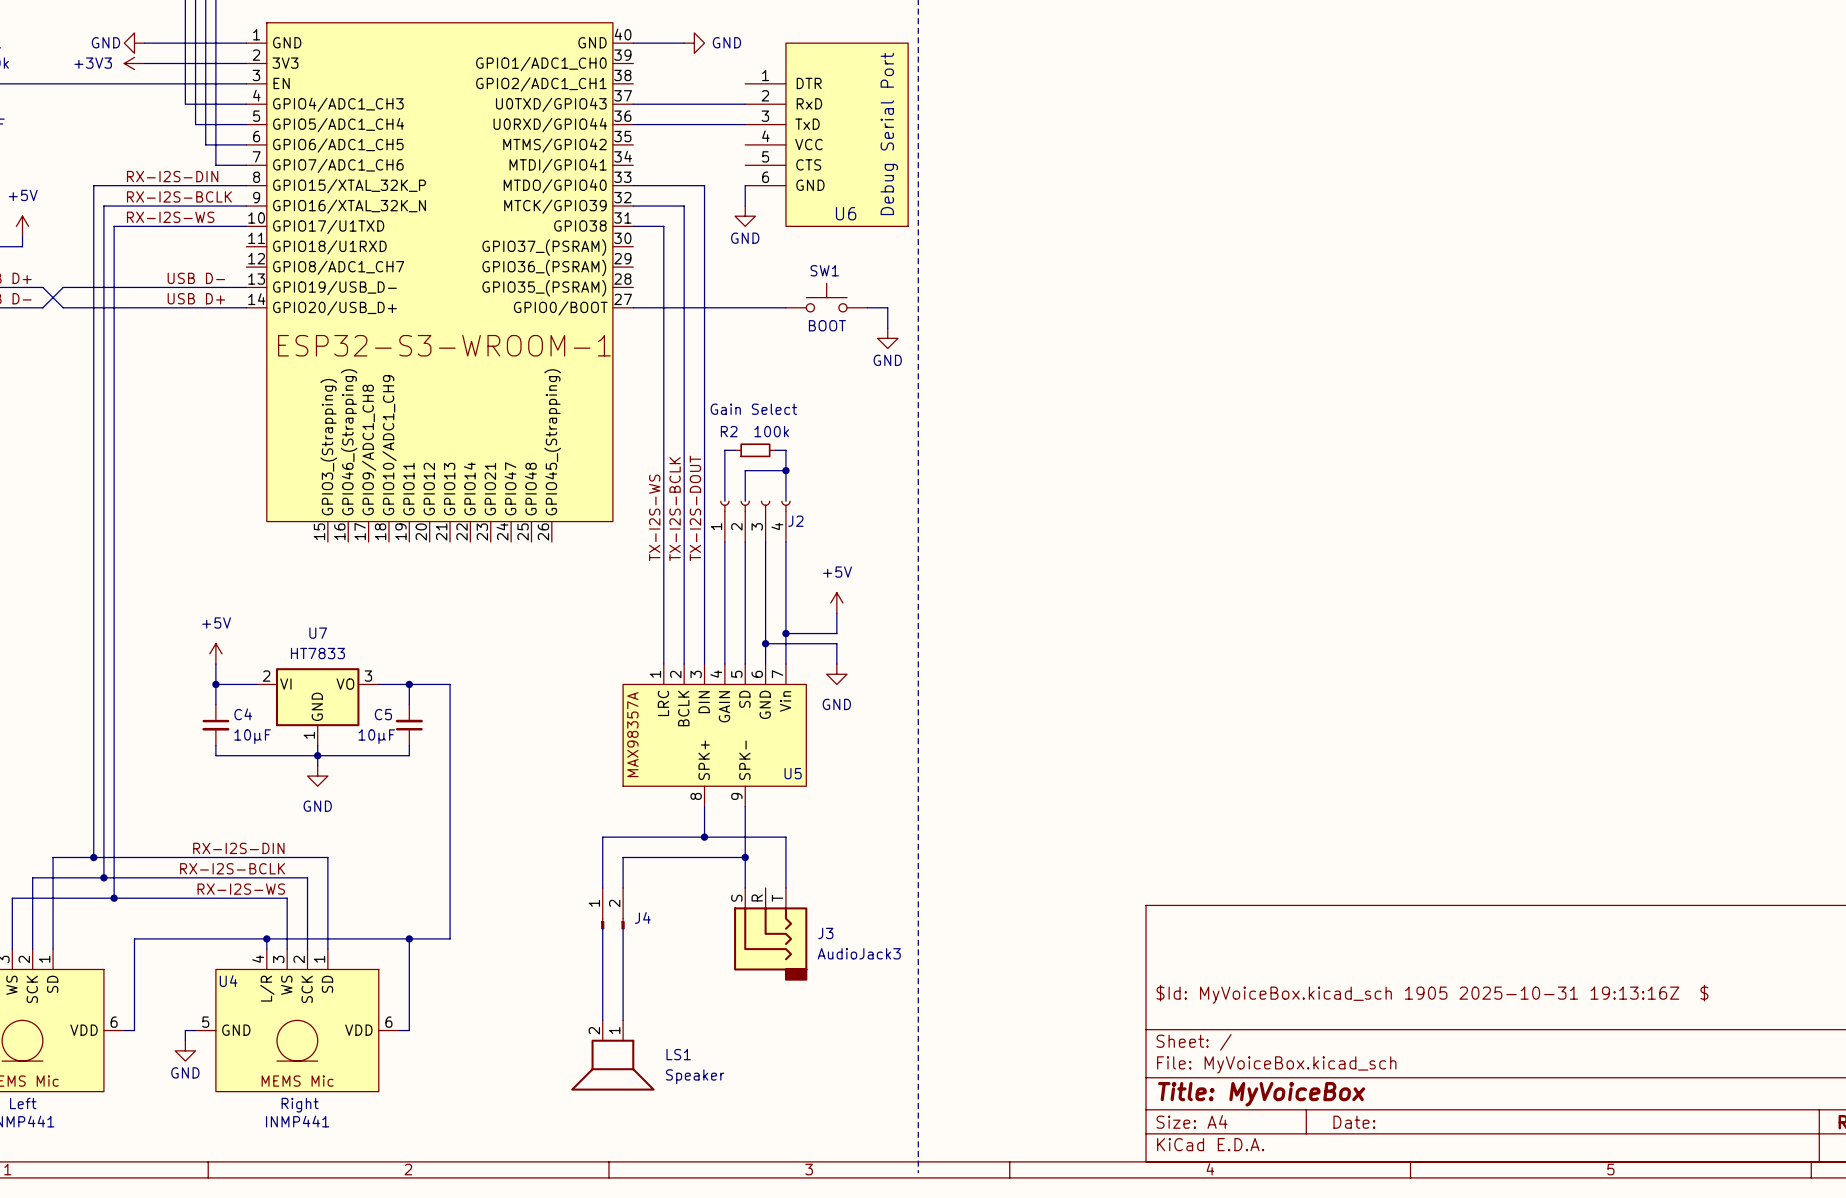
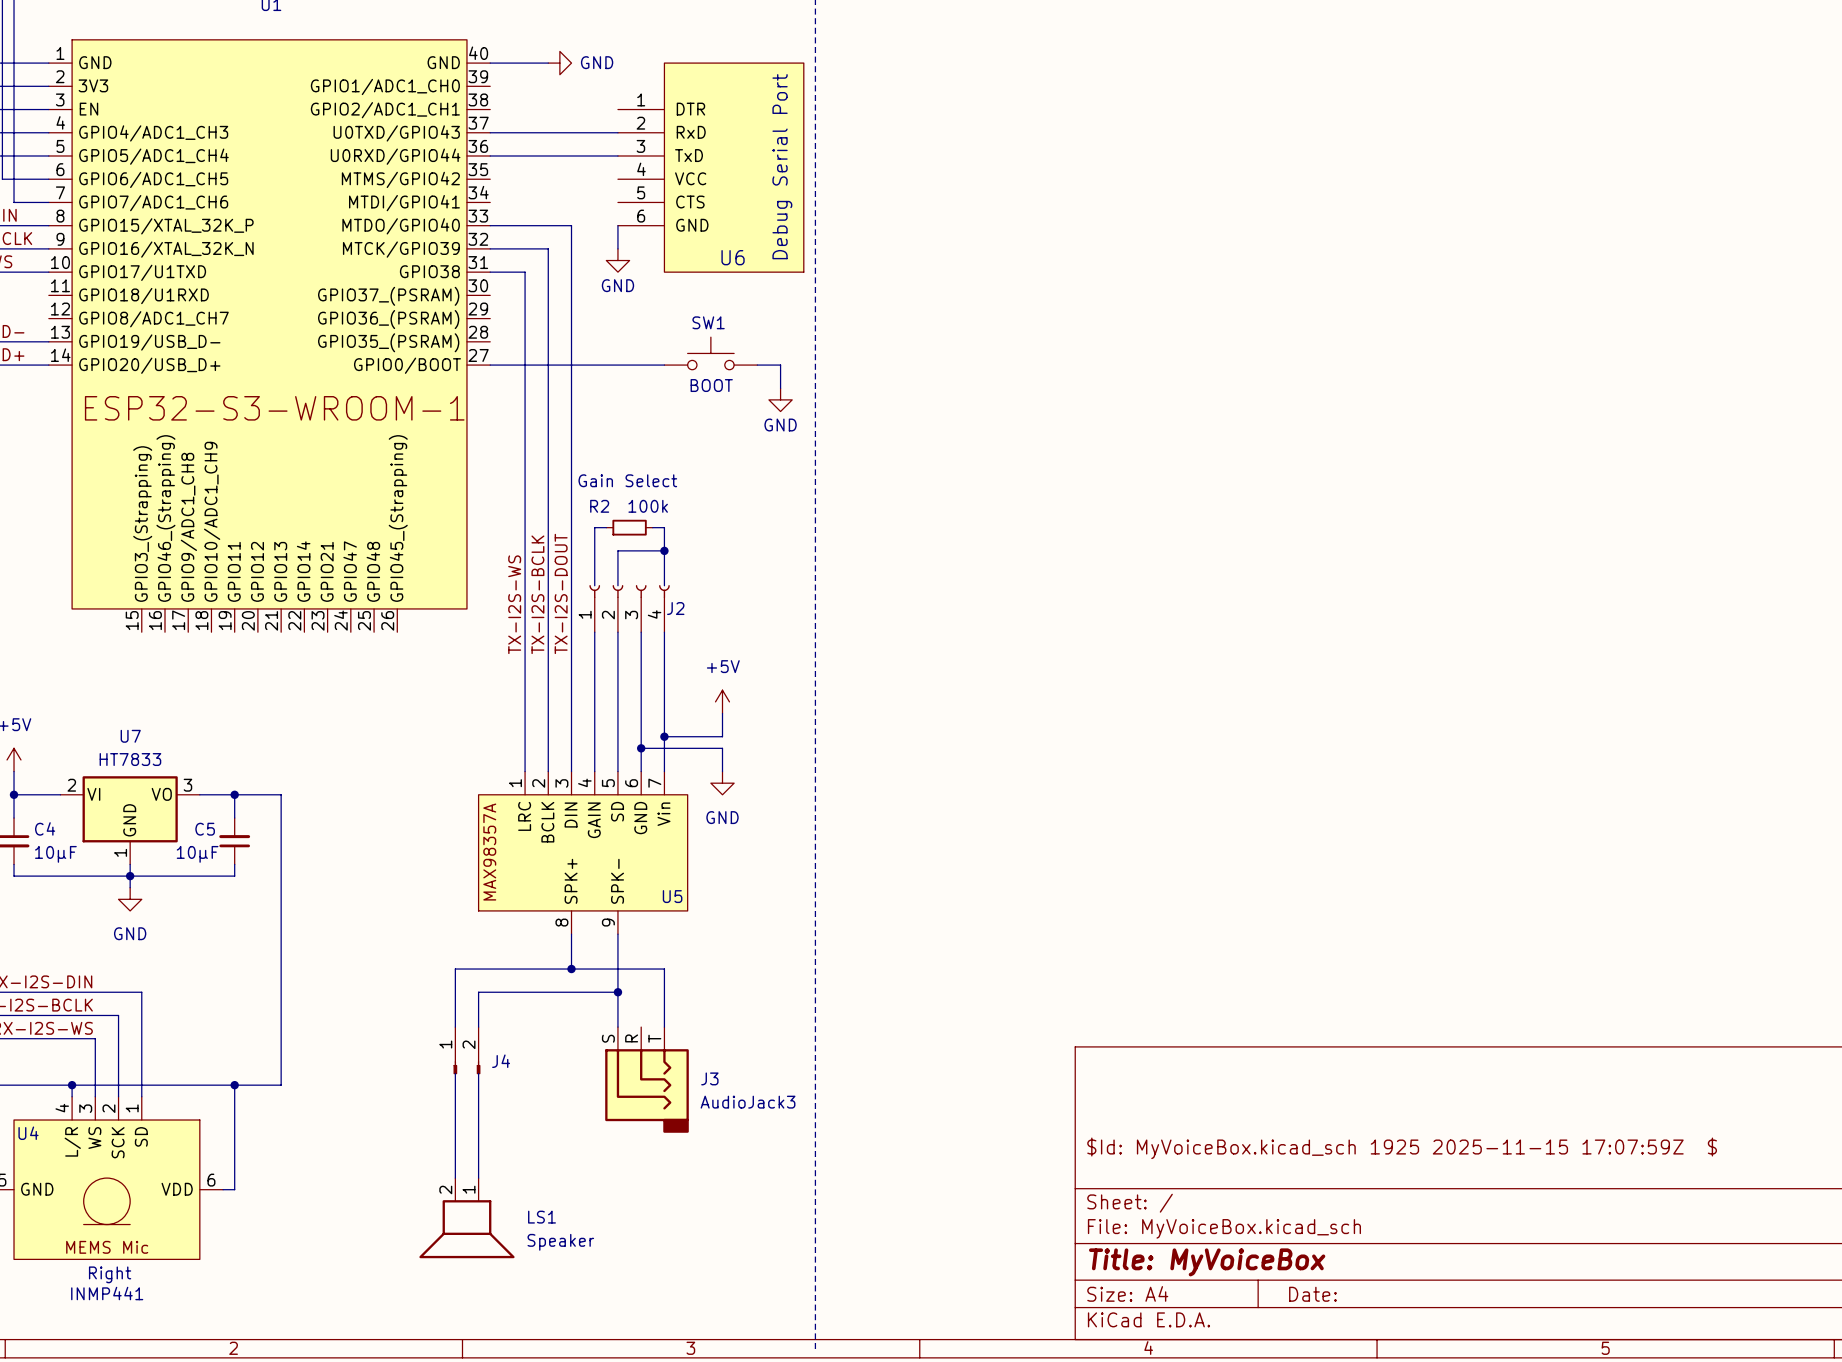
title block: $Id: MyVoiceBox.kicad_sch 1905 2025-10-31 19:13:16Z $ (1432, 994) -> $Id: MyVoiceBox.kicad_sch 1925 2025-11-15 17:07:59Z $ (1402, 1148)

